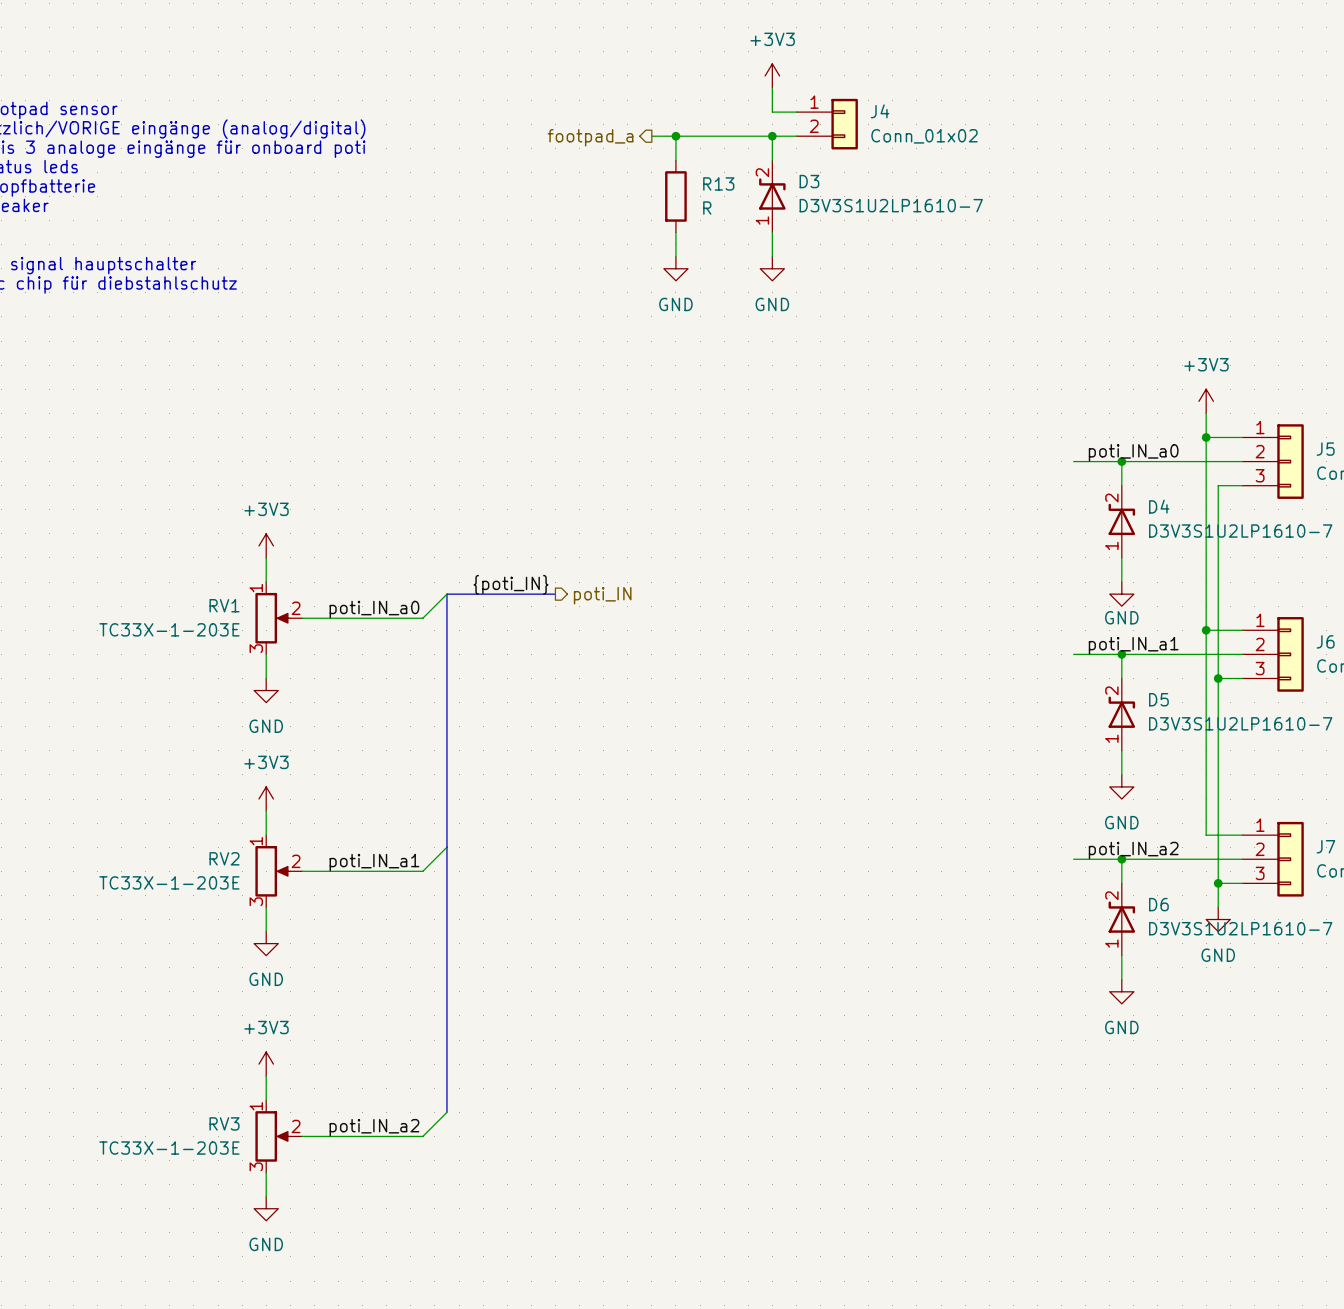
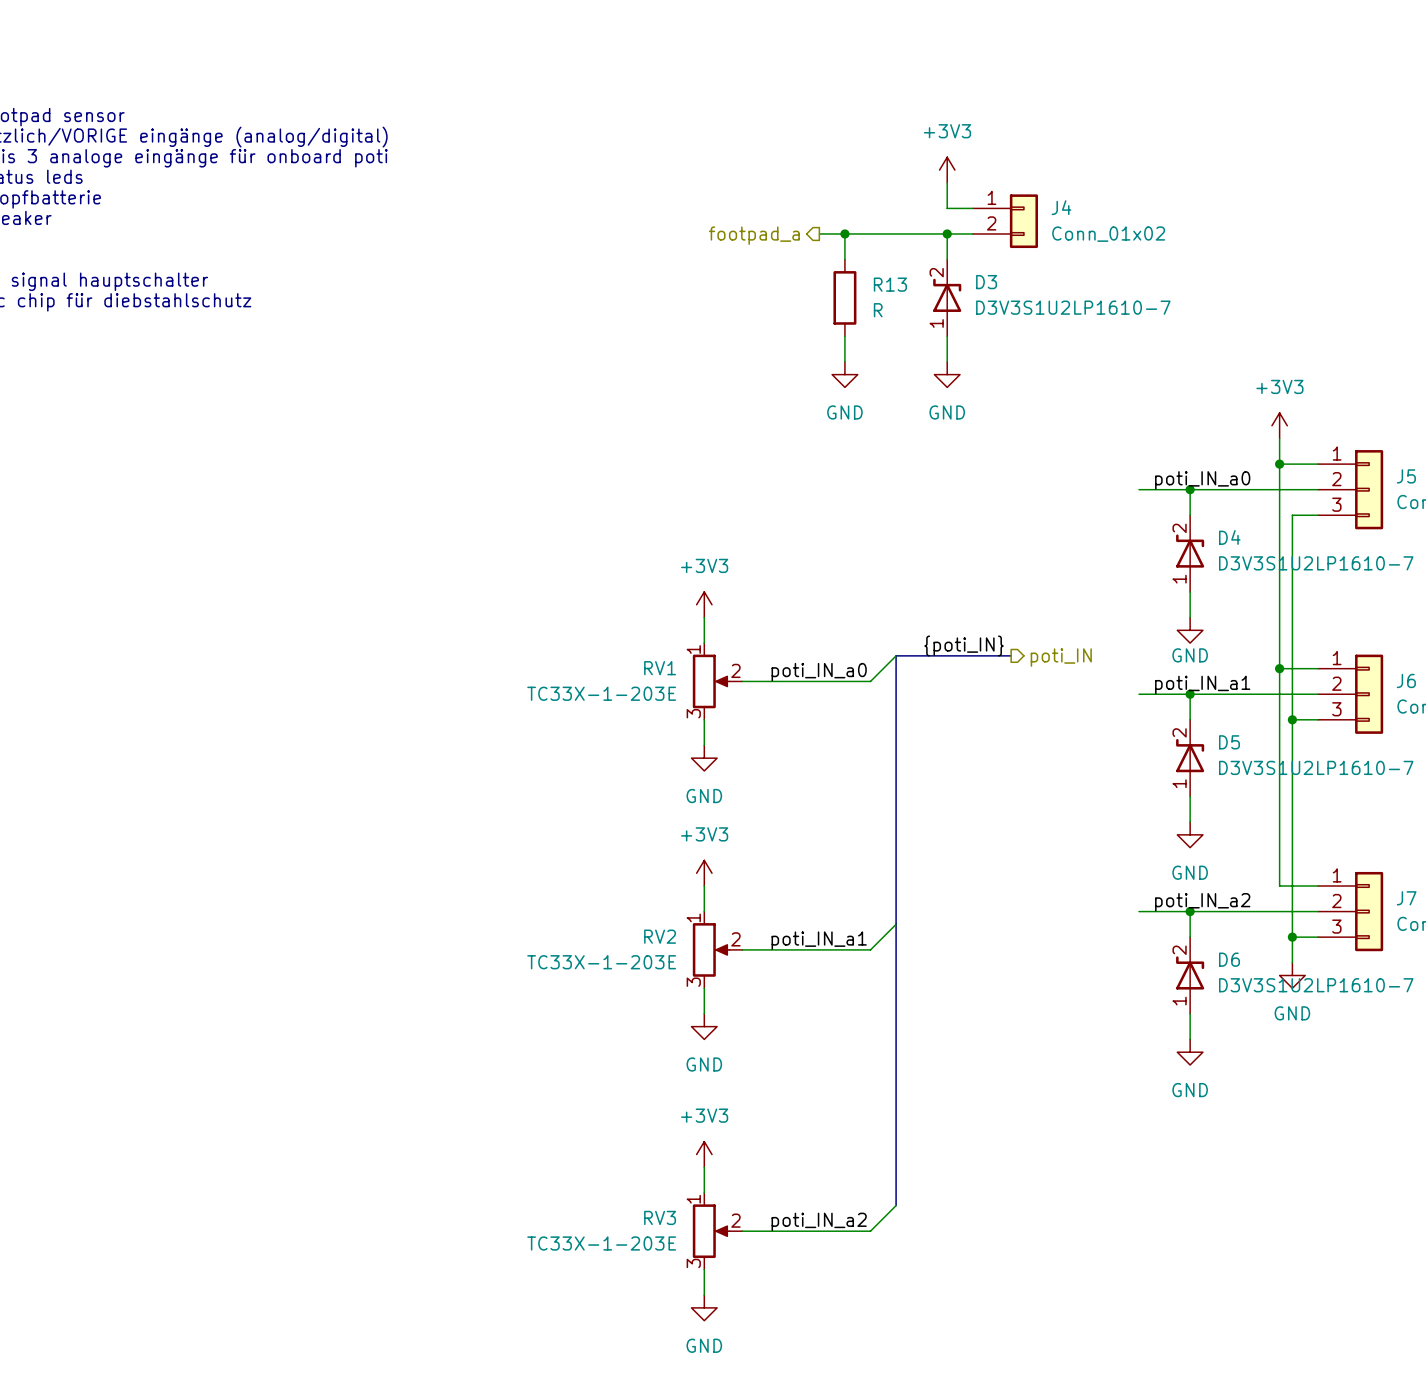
power symbol position: +3V3 (772, 75) -> +3V3 (947, 170)
wire: (772, 88) (772, 112) (796, 112) -> (947, 182) (947, 208) (972, 208)
J4 position: (827, 124) -> (1005, 221)
wire: (651, 136) (796, 136) -> (819, 233) (972, 233)
wire: (675, 136) (675, 160) -> (844, 233) (844, 259)
junction: (675, 136) -> none
wire: (772, 136) (772, 160) -> (947, 233) (947, 259)
junction: (772, 136) -> none
hierarchical label position: footpad_a (590, 137) -> footpad_a (754, 235)
R13 position: (675, 196) -> (844, 297)
D3 position: (772, 196) -> (947, 297)
junction: none -> (844, 233)
junction: none -> (947, 233)
wire: (675, 232) (675, 256) -> (844, 336) (844, 361)
wire: (772, 232) (772, 256) -> (947, 336) (947, 361)
power symbol: GND (675, 268) -> none
power symbol: GND (772, 268) -> none
power symbol: none -> GND (844, 374)
power symbol: none -> GND (947, 374)
power symbol: +3V3 (266, 545) -> none
wire: (266, 557) (266, 582) -> none
power symbol: none -> +3V3 (704, 604)
wire: none -> (704, 617) (704, 643)
label: {poti_IN} (511, 584) -> none
wire: (446, 594) (422, 618) (302, 618) -> none
bus: (555, 594) (446, 594) (446, 1112) -> none
hierarchical label: poti_IN (602, 595) -> none
label: none -> {poti_IN} (964, 645)
label: poti_IN_a0 (374, 609) -> none
RV1 position: (278, 618) -> (717, 681)
wire: none -> (896, 655) (870, 681) (742, 681)
bus: none -> (1011, 655) (896, 655) (896, 1205)
hierarchical label: none -> poti_IN (1061, 657)
label: none -> poti_IN_a0 (819, 672)
wire: (266, 654) (266, 678) -> none
wire: none -> (704, 719) (704, 745)
power symbol: GND (266, 690) -> none
power symbol: none -> GND (704, 758)
power symbol: +3V3 (266, 799) -> none
wire: (266, 811) (266, 835) -> none
power symbol: none -> +3V3 (704, 873)
wire: none -> (704, 886) (704, 911)
wire: (446, 847) (422, 871) (302, 871) -> none
label: poti_IN_a1 (374, 862) -> none
RV2 position: (278, 871) -> (717, 949)
wire: none -> (896, 924) (870, 949) (742, 949)
label: none -> poti_IN_a1 (819, 940)
wire: (266, 907) (266, 931) -> none
wire: none -> (704, 988) (704, 1013)
power symbol: GND (266, 943) -> none
power symbol: none -> GND (704, 1026)
power symbol: +3V3 (266, 1064) -> none
wire: (266, 1076) (266, 1100) -> none
power symbol: none -> +3V3 (704, 1154)
wire: none -> (704, 1167) (704, 1192)
wire: (446, 1112) (422, 1136) (302, 1136) -> none
label: poti_IN_a2 (374, 1127) -> none
RV3 position: (278, 1136) -> (717, 1231)
wire: none -> (896, 1205) (870, 1231) (742, 1231)
label: none -> poti_IN_a2 (819, 1221)
wire: (266, 1172) (266, 1196) -> none
wire: none -> (704, 1269) (704, 1295)
power symbol: GND (266, 1208) -> none
power symbol: none -> GND (704, 1307)

